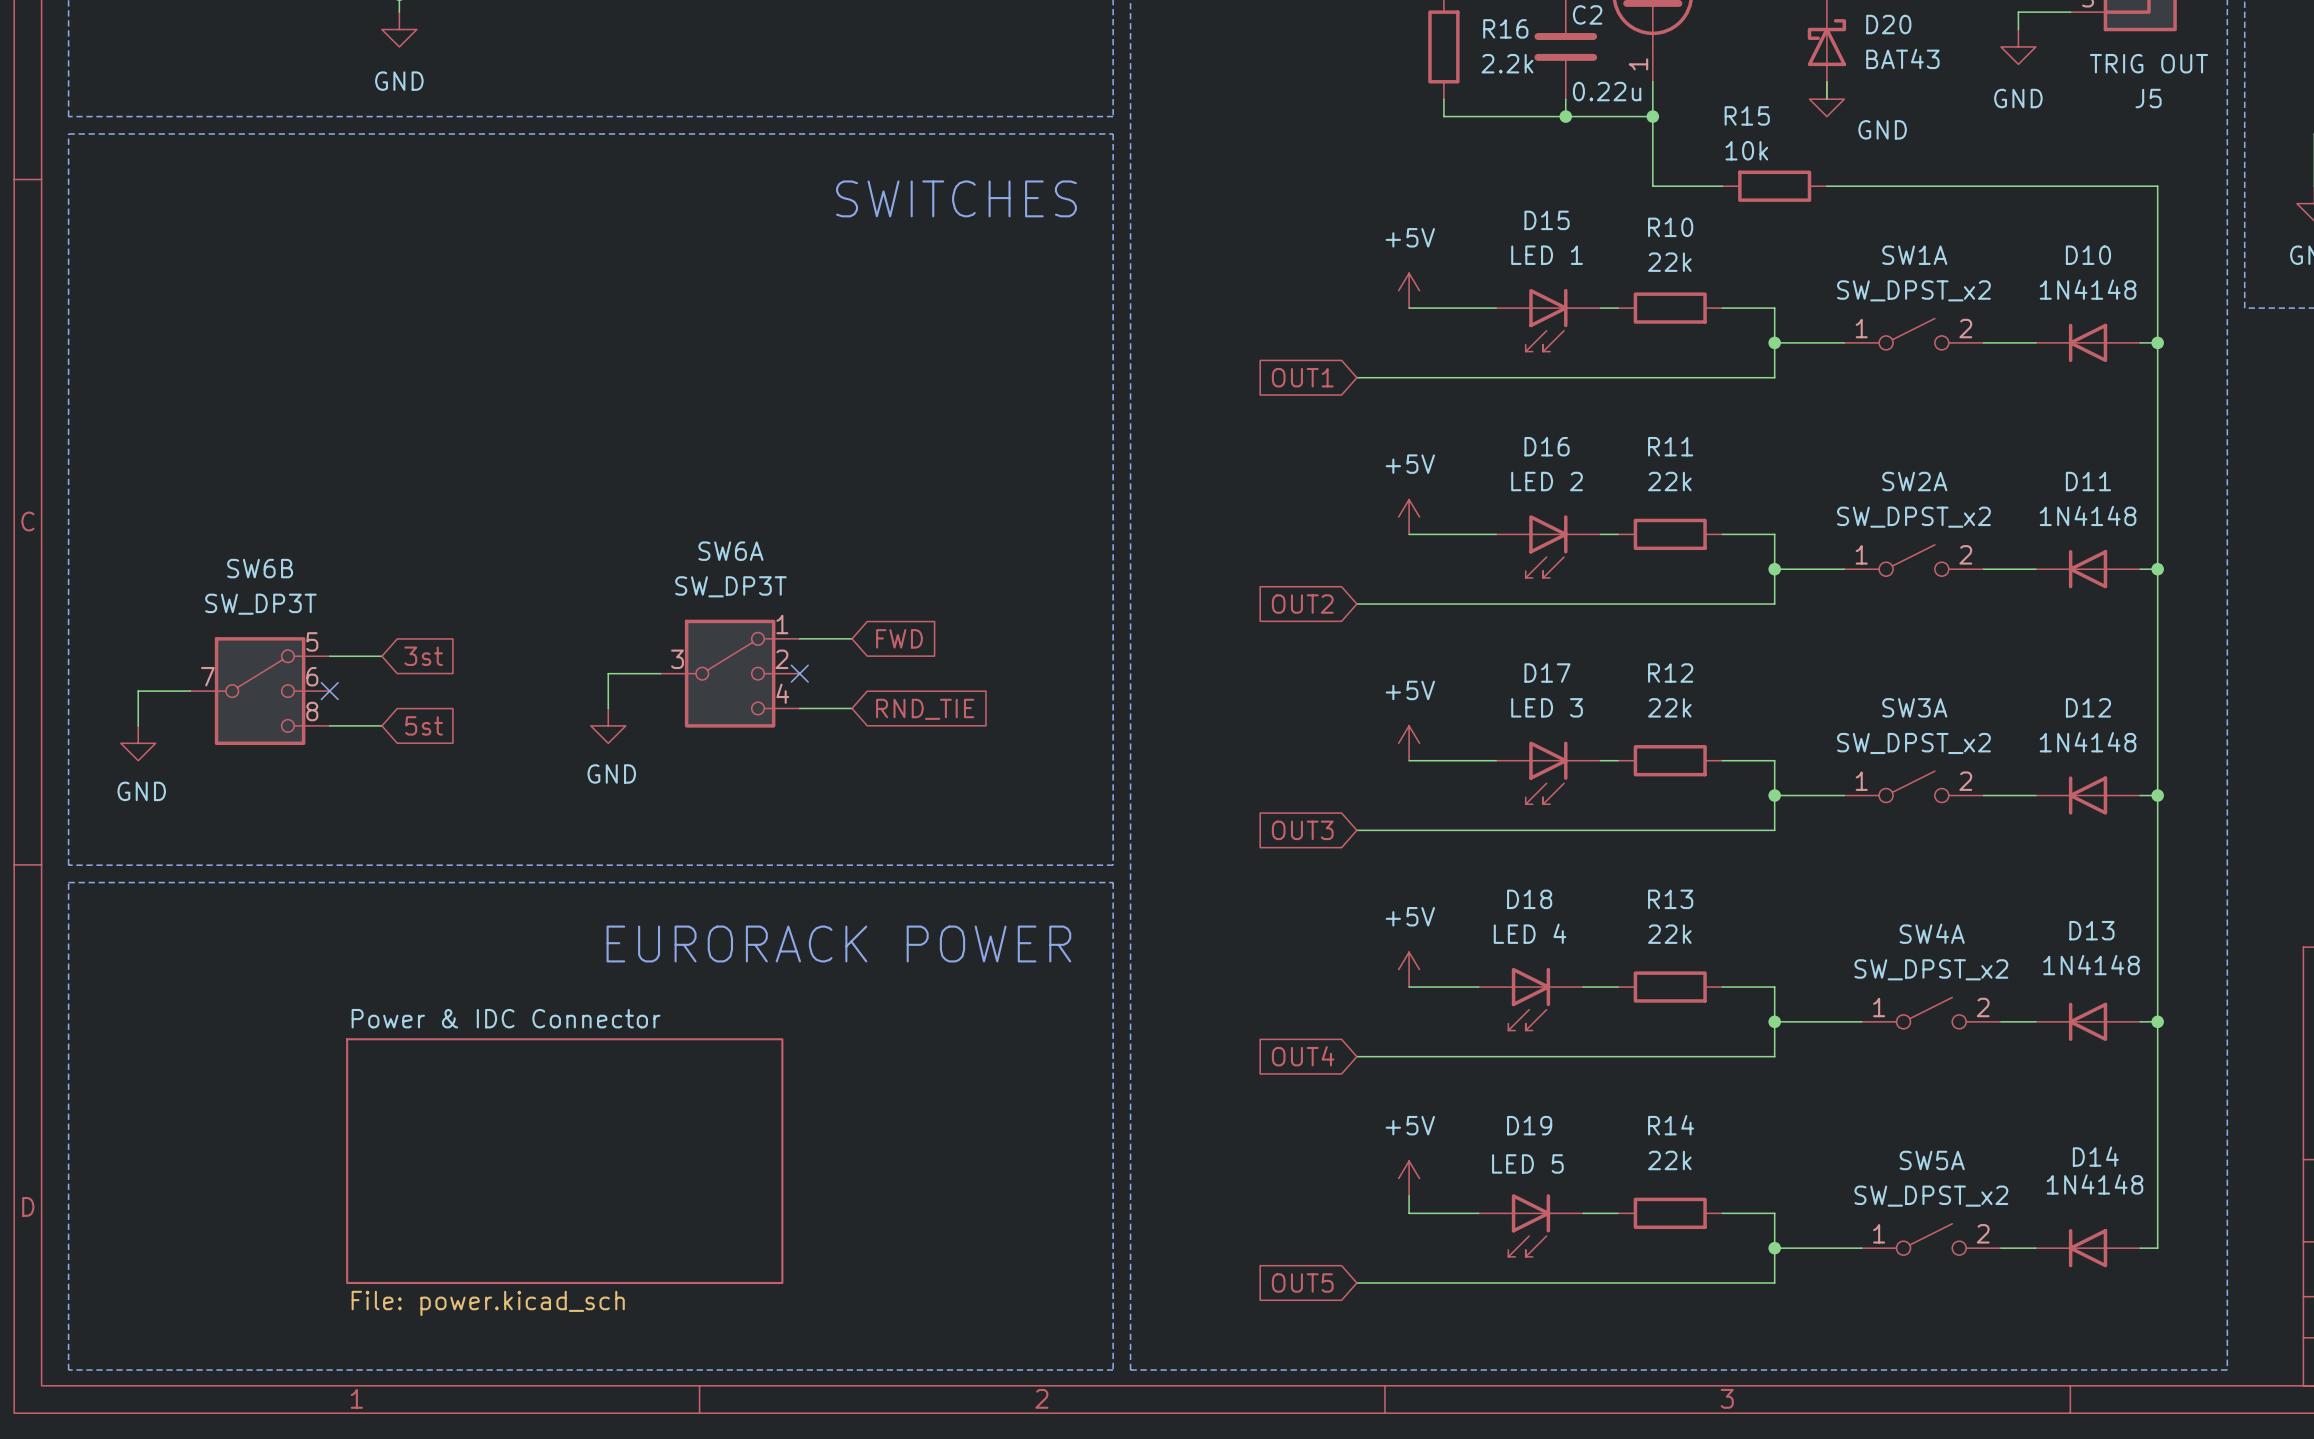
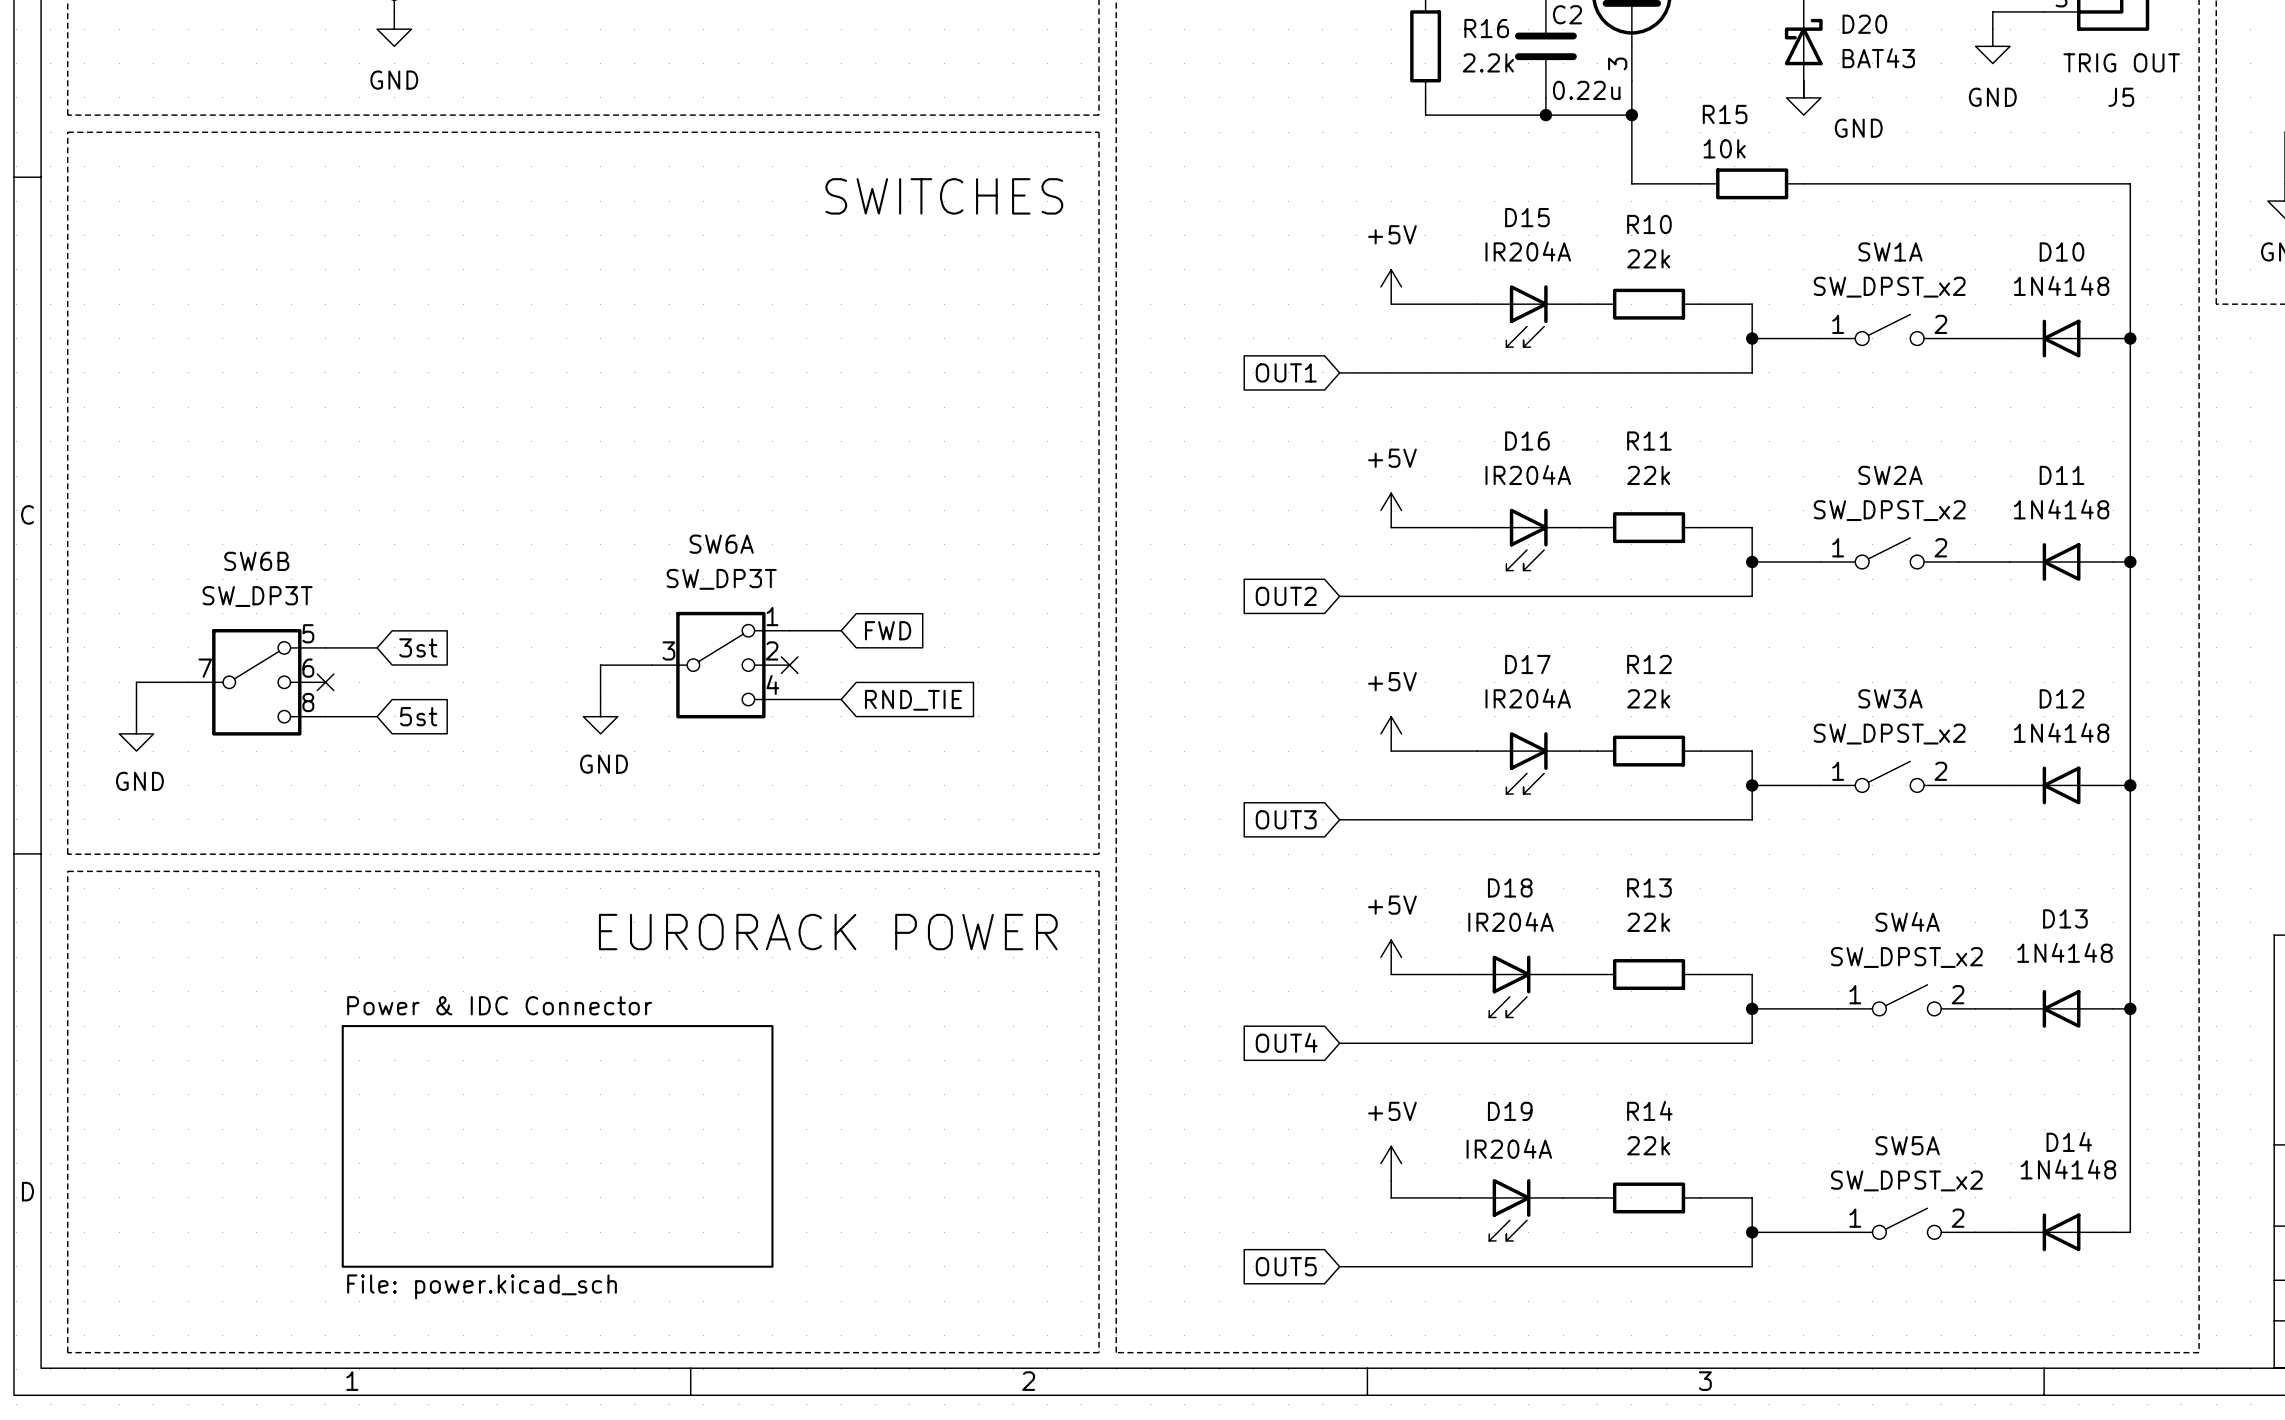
part pin number: 1 (1638, 64) -> 3 (1617, 63)
D15 value: LED 1 (1547, 255) -> IR204A (1528, 251)
D16 value: LED 2 (1547, 481) -> IR204A (1528, 475)
D17 value: LED 3 (1547, 707) -> IR204A (1528, 698)
D18 value: LED 4 (1530, 933) -> IR204A (1511, 921)
D19 value: LED 5 (1527, 1163) -> IR204A (1509, 1148)

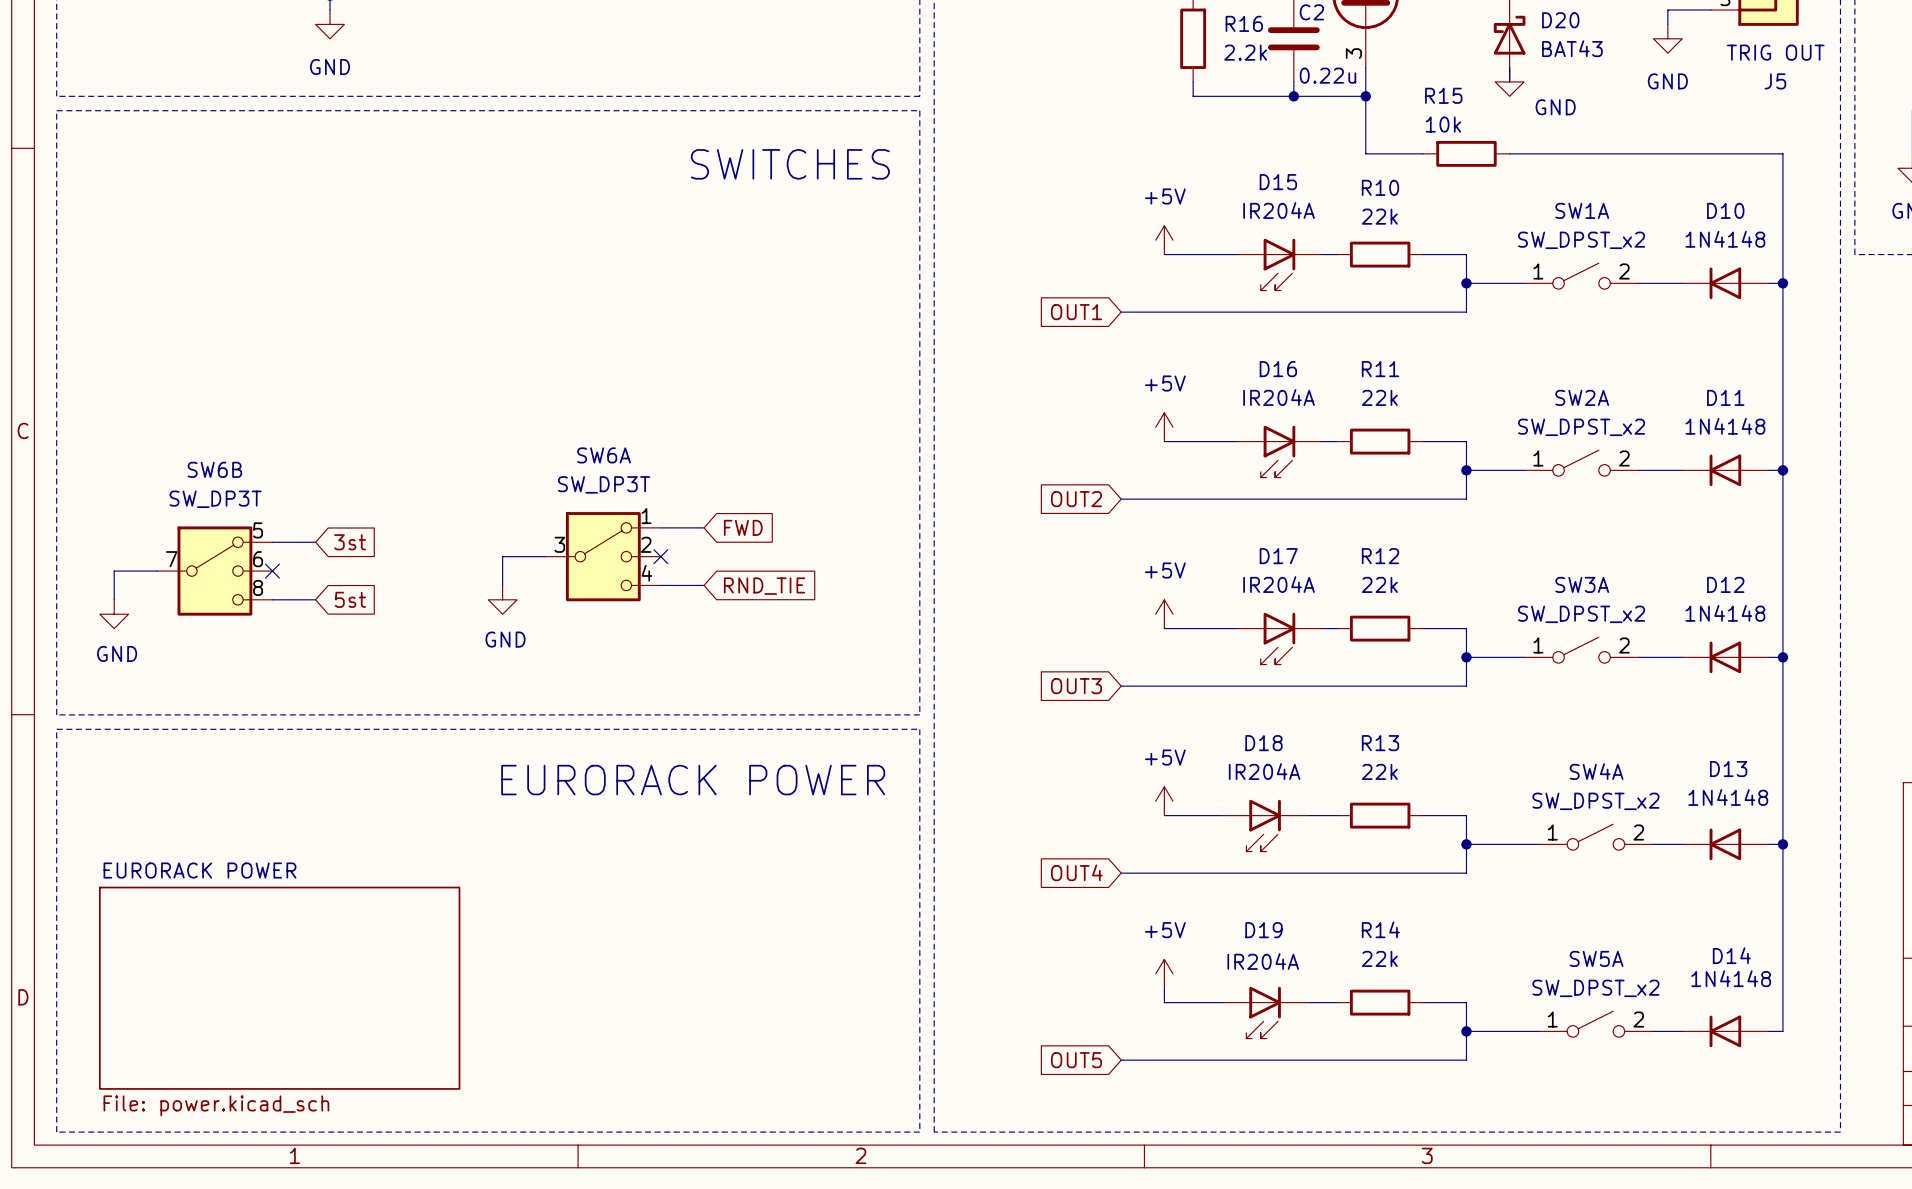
sheet Power & IDC Connector: File: power.kicad_sch (557, 1146) -> none
sheet EURORACK POWER: none -> File: power.kicad_sch (279, 988)

